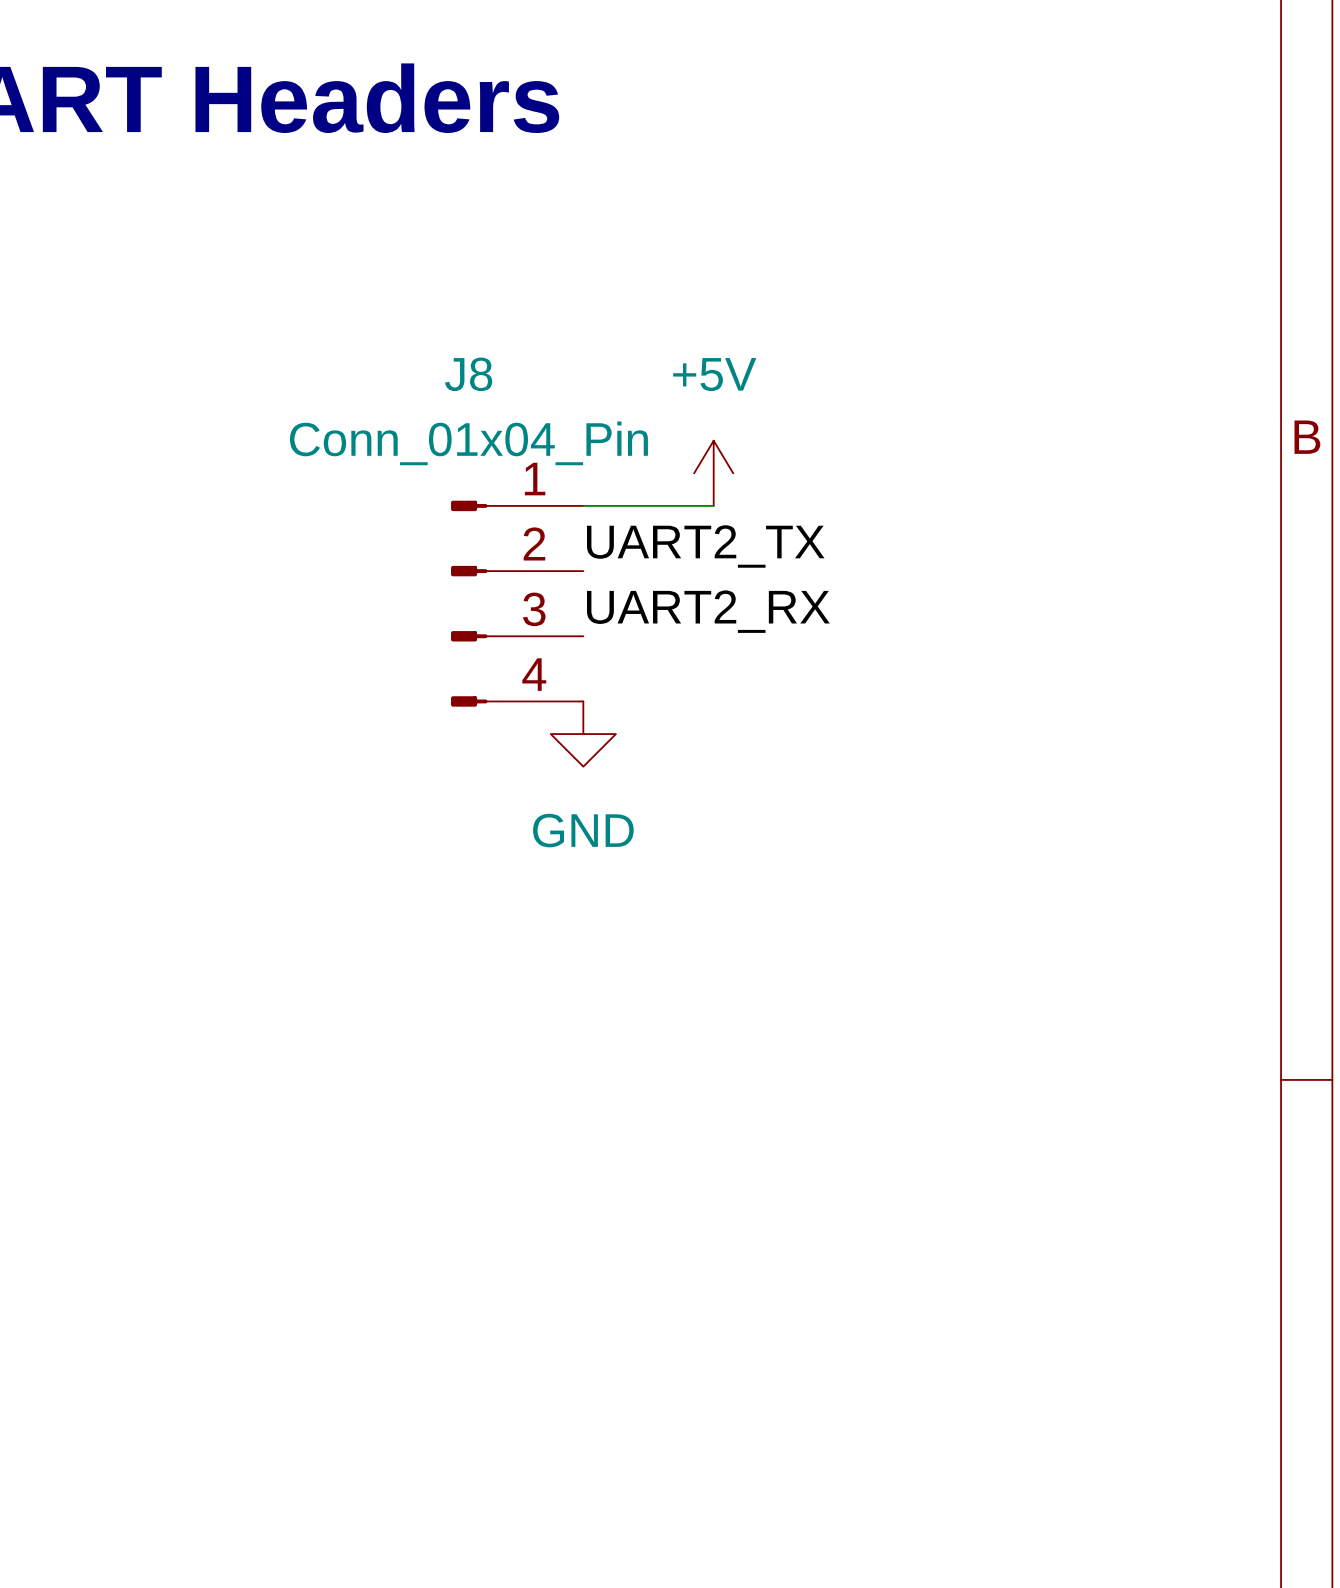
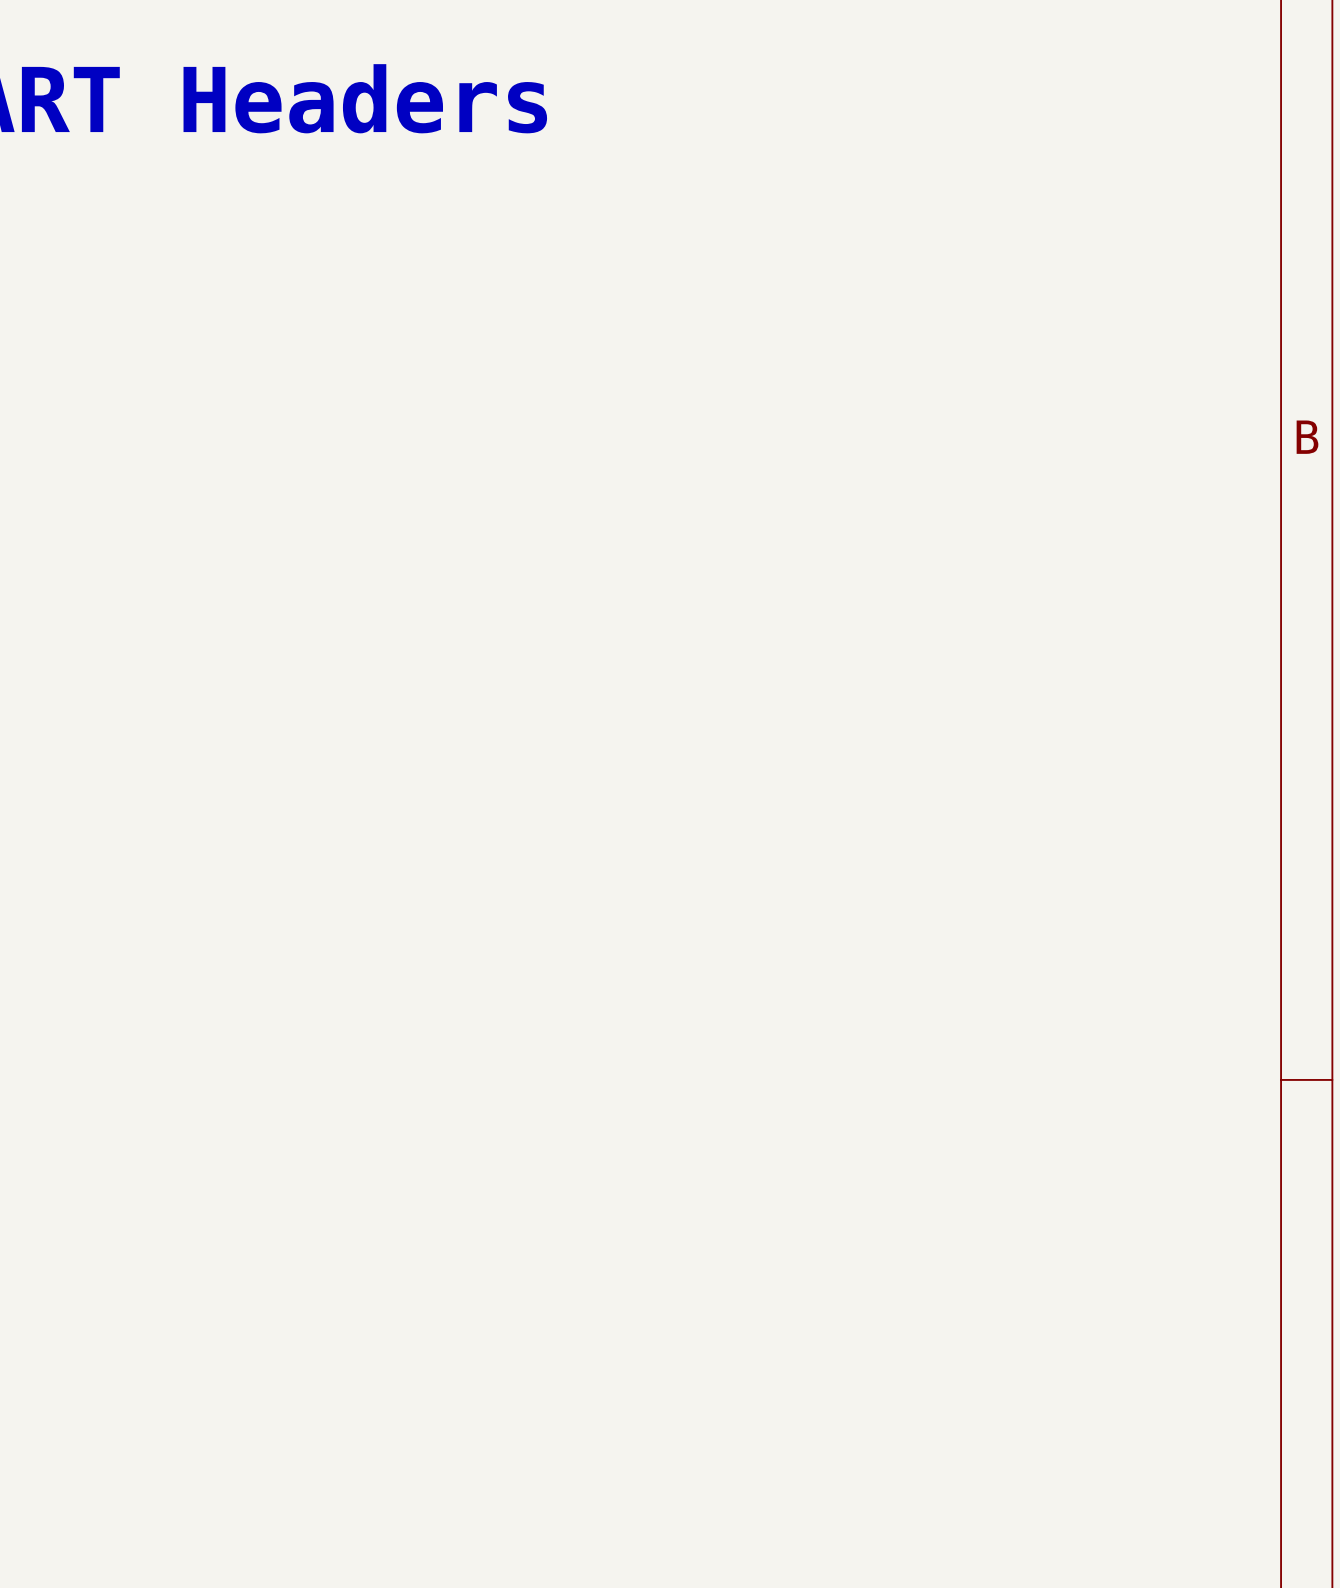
power symbol: +5V (713, 473) -> none
wire: (583, 505) (713, 505) -> none
label: UART2_TX (705, 546) -> none
J8: Conn_01x04_Pin (517, 603) -> none
label: UART2_RX (708, 611) -> none
power symbol: GND (583, 734) -> none

